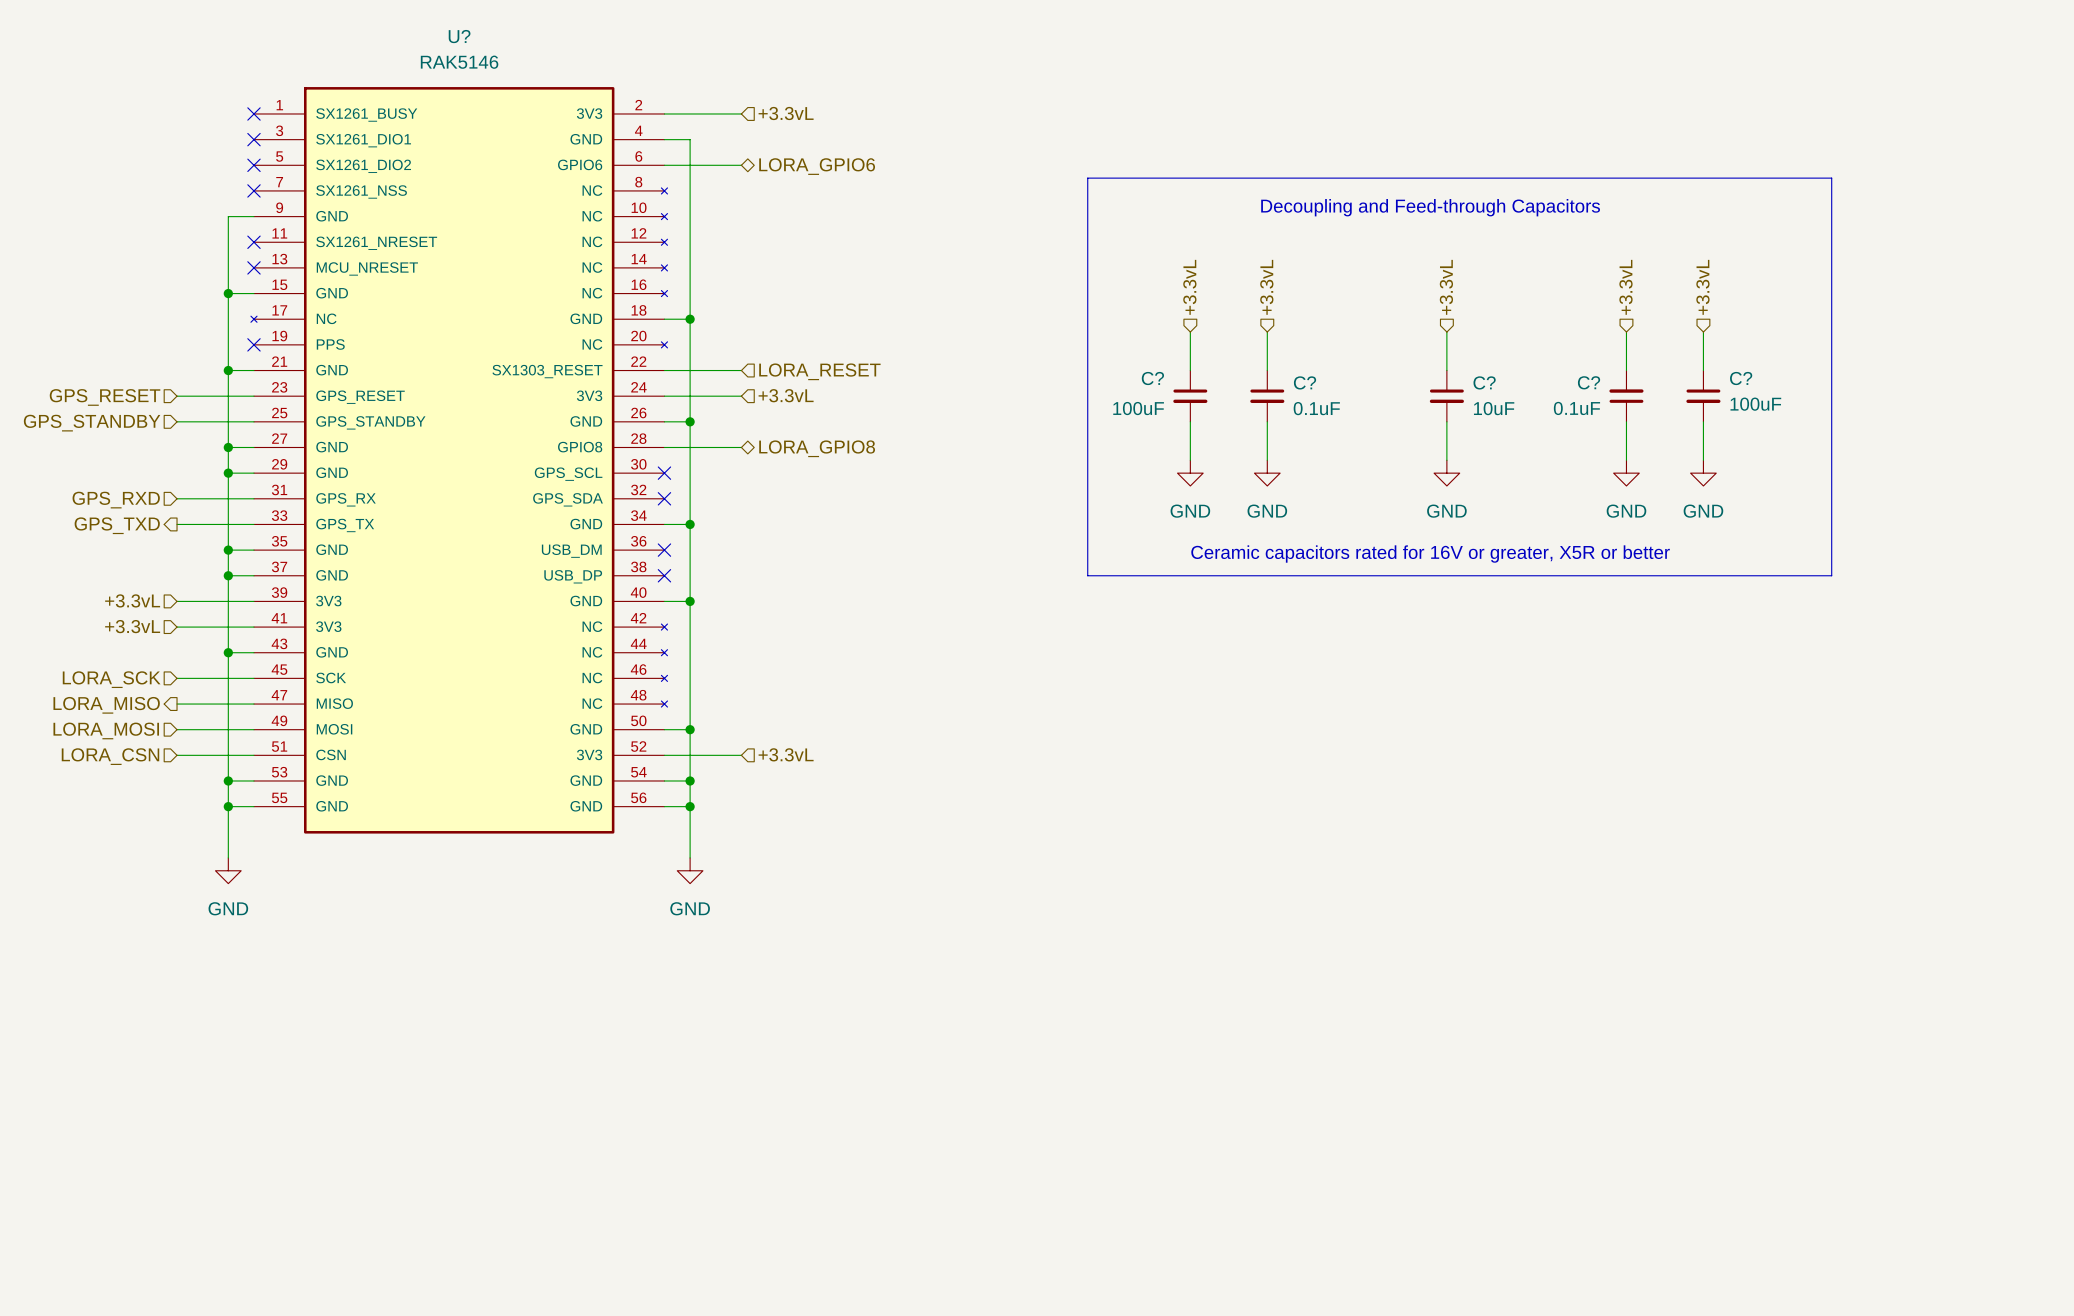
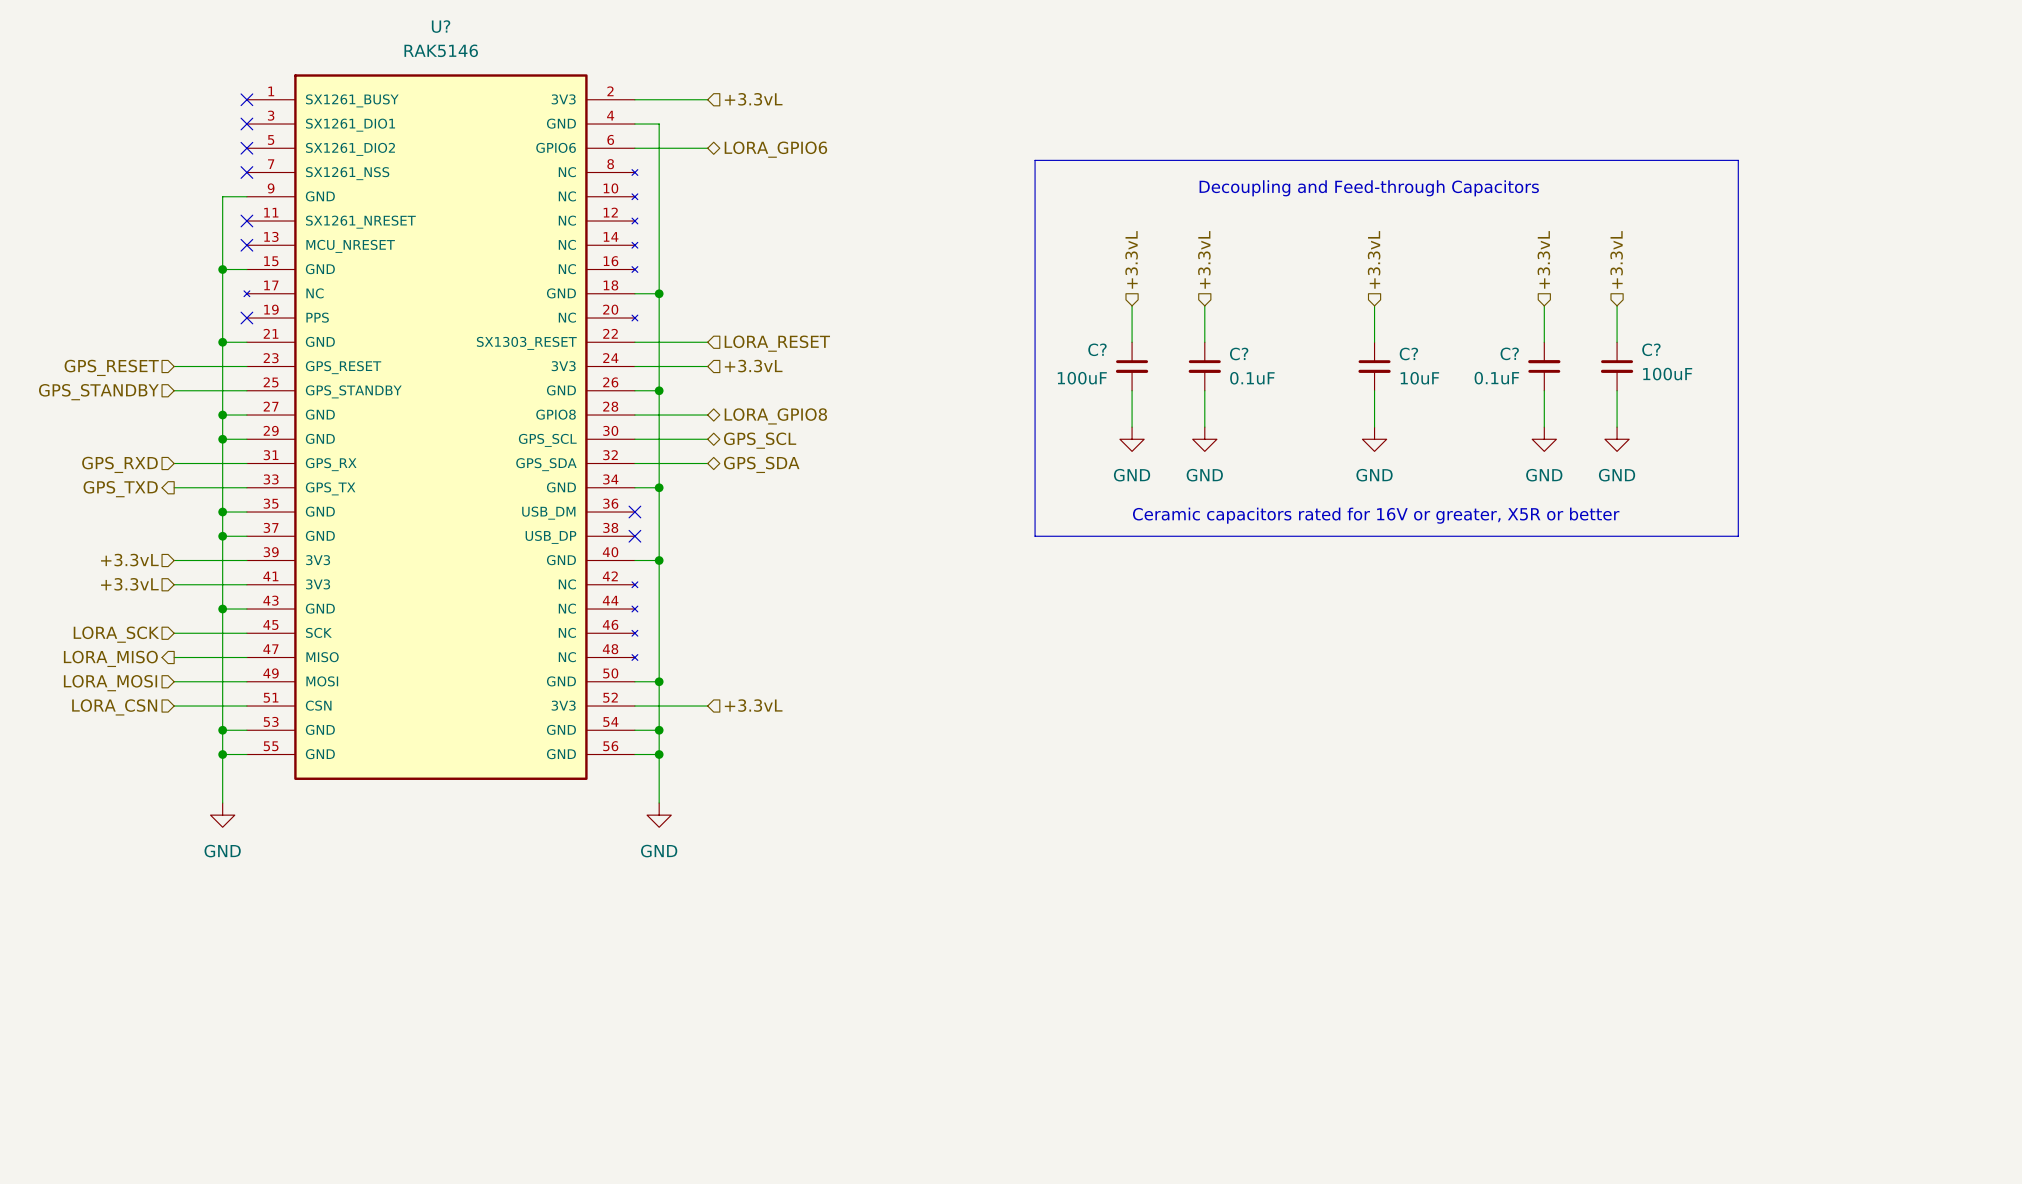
wire: none -> (634, 439) (707, 439)
no-connect mark: (664, 473) -> none
hierarchical label: none -> GPS_SCL (760, 440)
wire: none -> (634, 463) (707, 463)
no-connect mark: (664, 498) -> none
hierarchical label: none -> GPS_SDA (761, 464)

